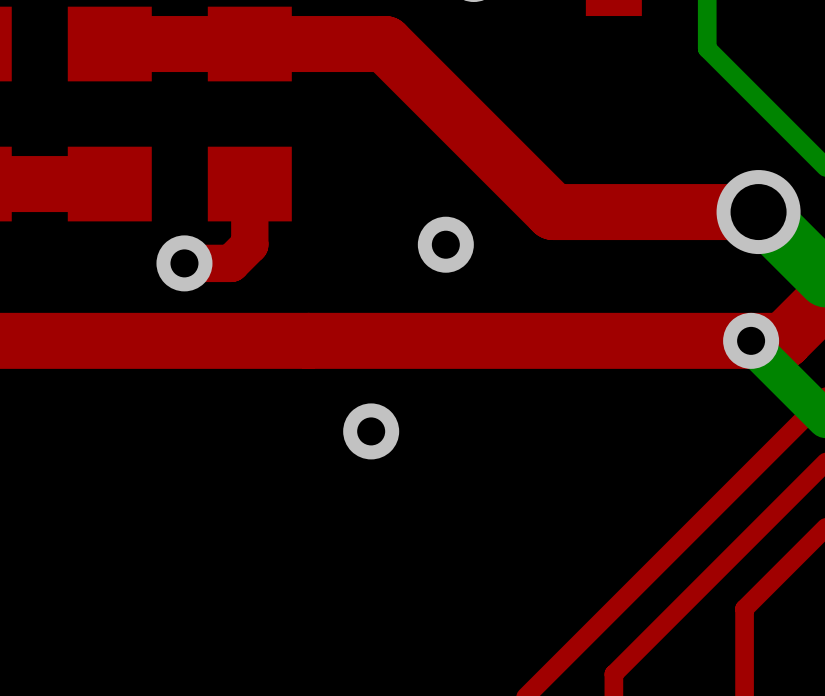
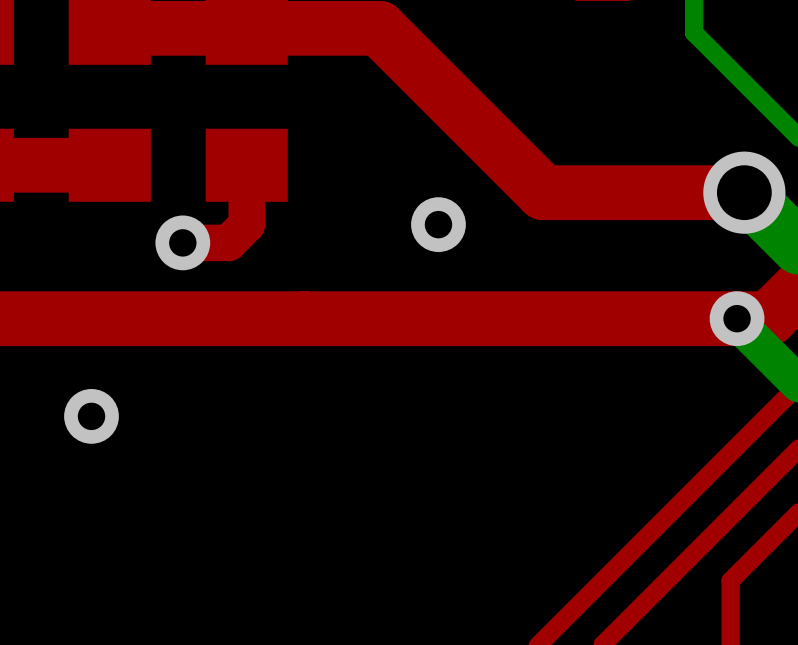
via position: (371, 431) -> (91, 416)

